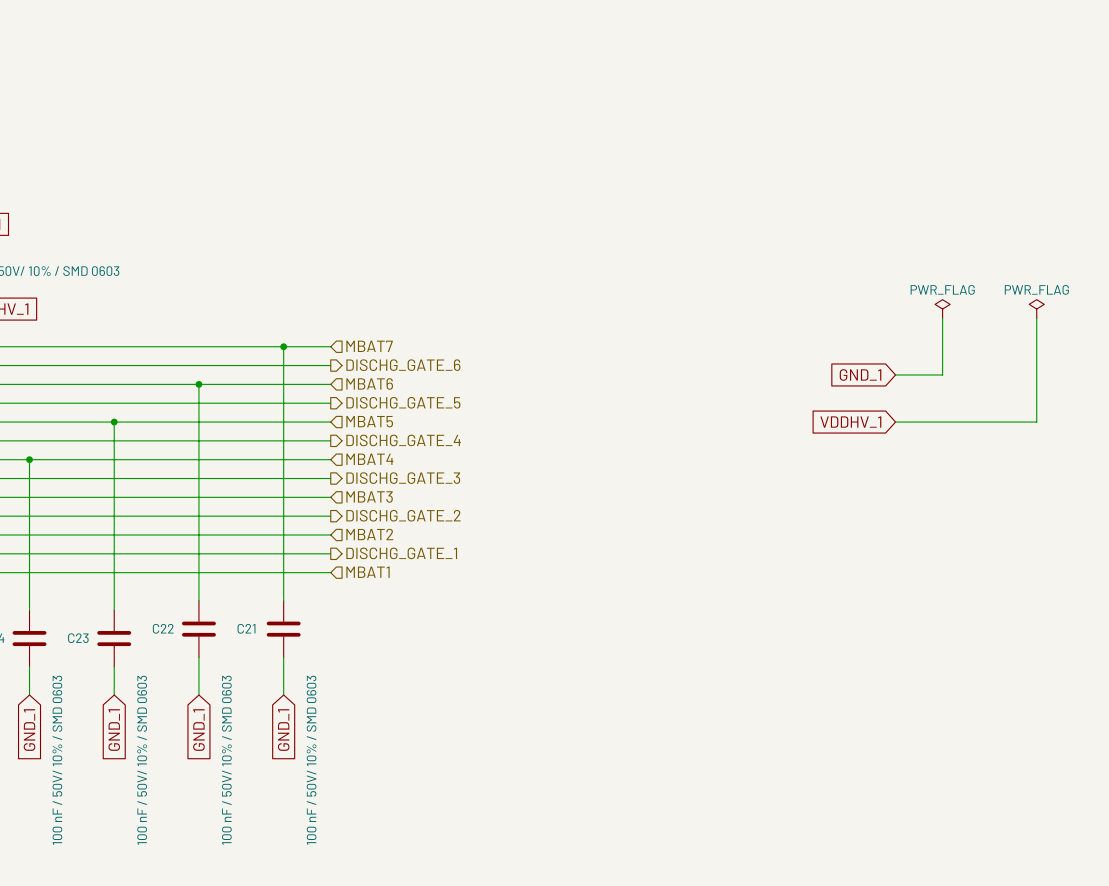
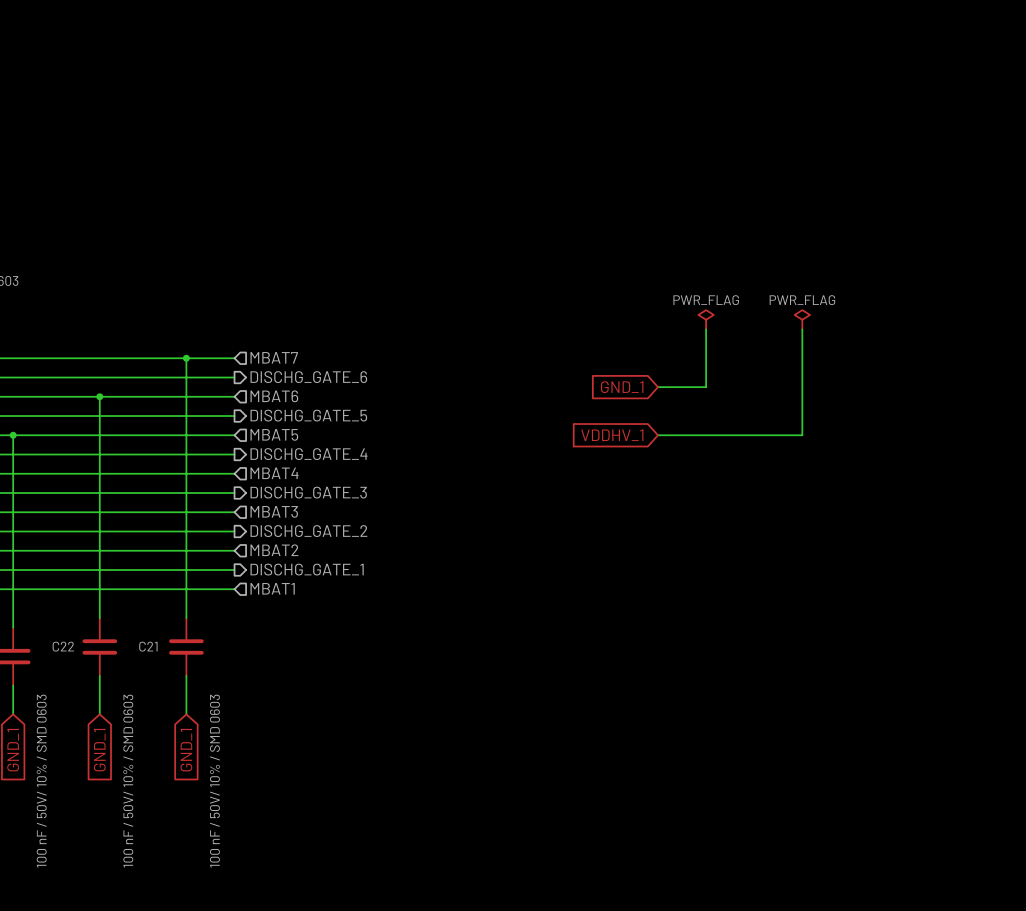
power symbol: none -> PWR_FLAG (706, 319)
power symbol position: PWR_FLAG (942, 309) -> PWR_FLAG (802, 319)
power symbol: PWR_FLAG (1036, 309) -> none
wire: (942, 318) (942, 374) (895, 374) -> (706, 329) (706, 387) (657, 387)
wire: (1036, 318) (1036, 422) (895, 422) -> (802, 329) (802, 435) (657, 435)
global label position: GND_1 (860, 374) -> GND_1 (622, 387)
global label position: VDDHV_1 (850, 422) -> VDDHV_1 (612, 435)

